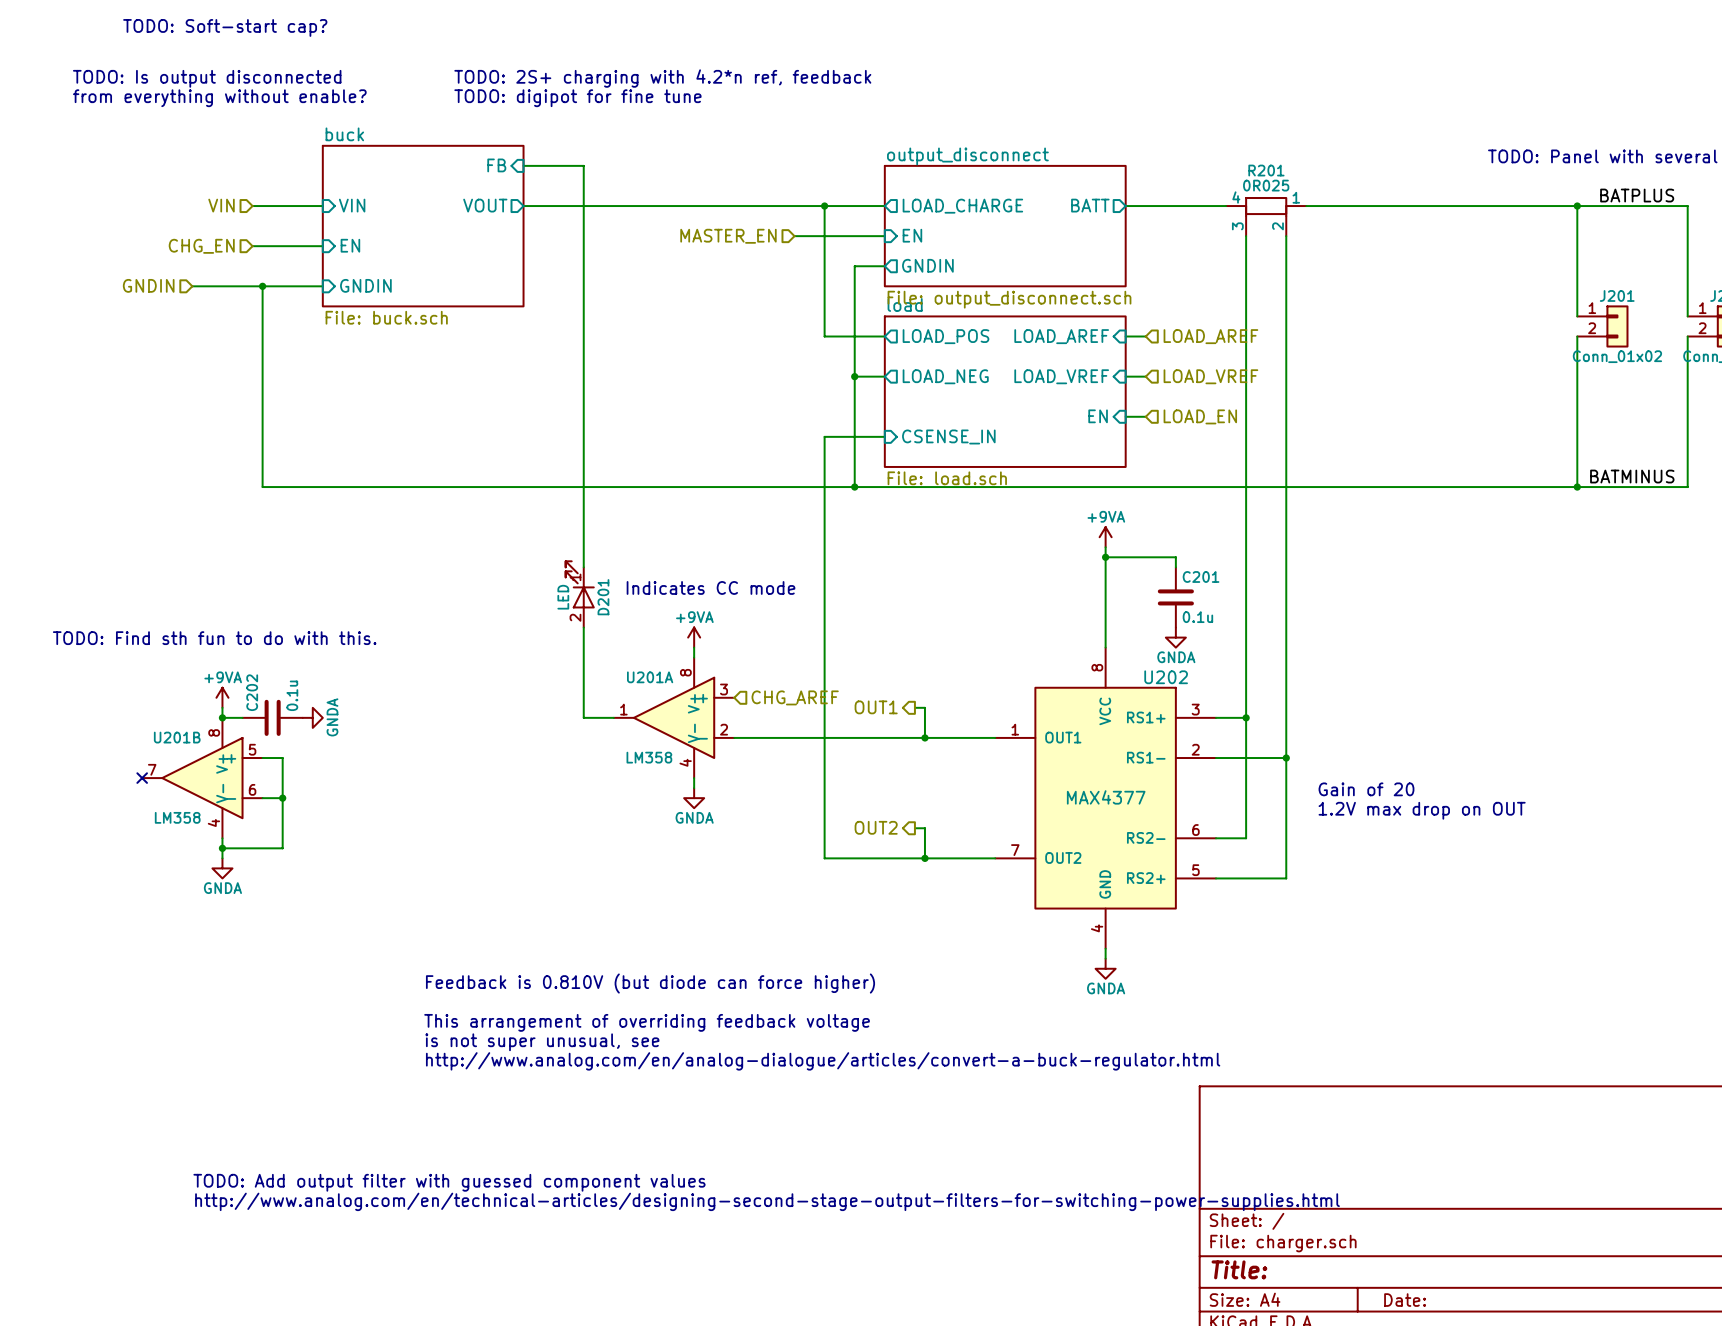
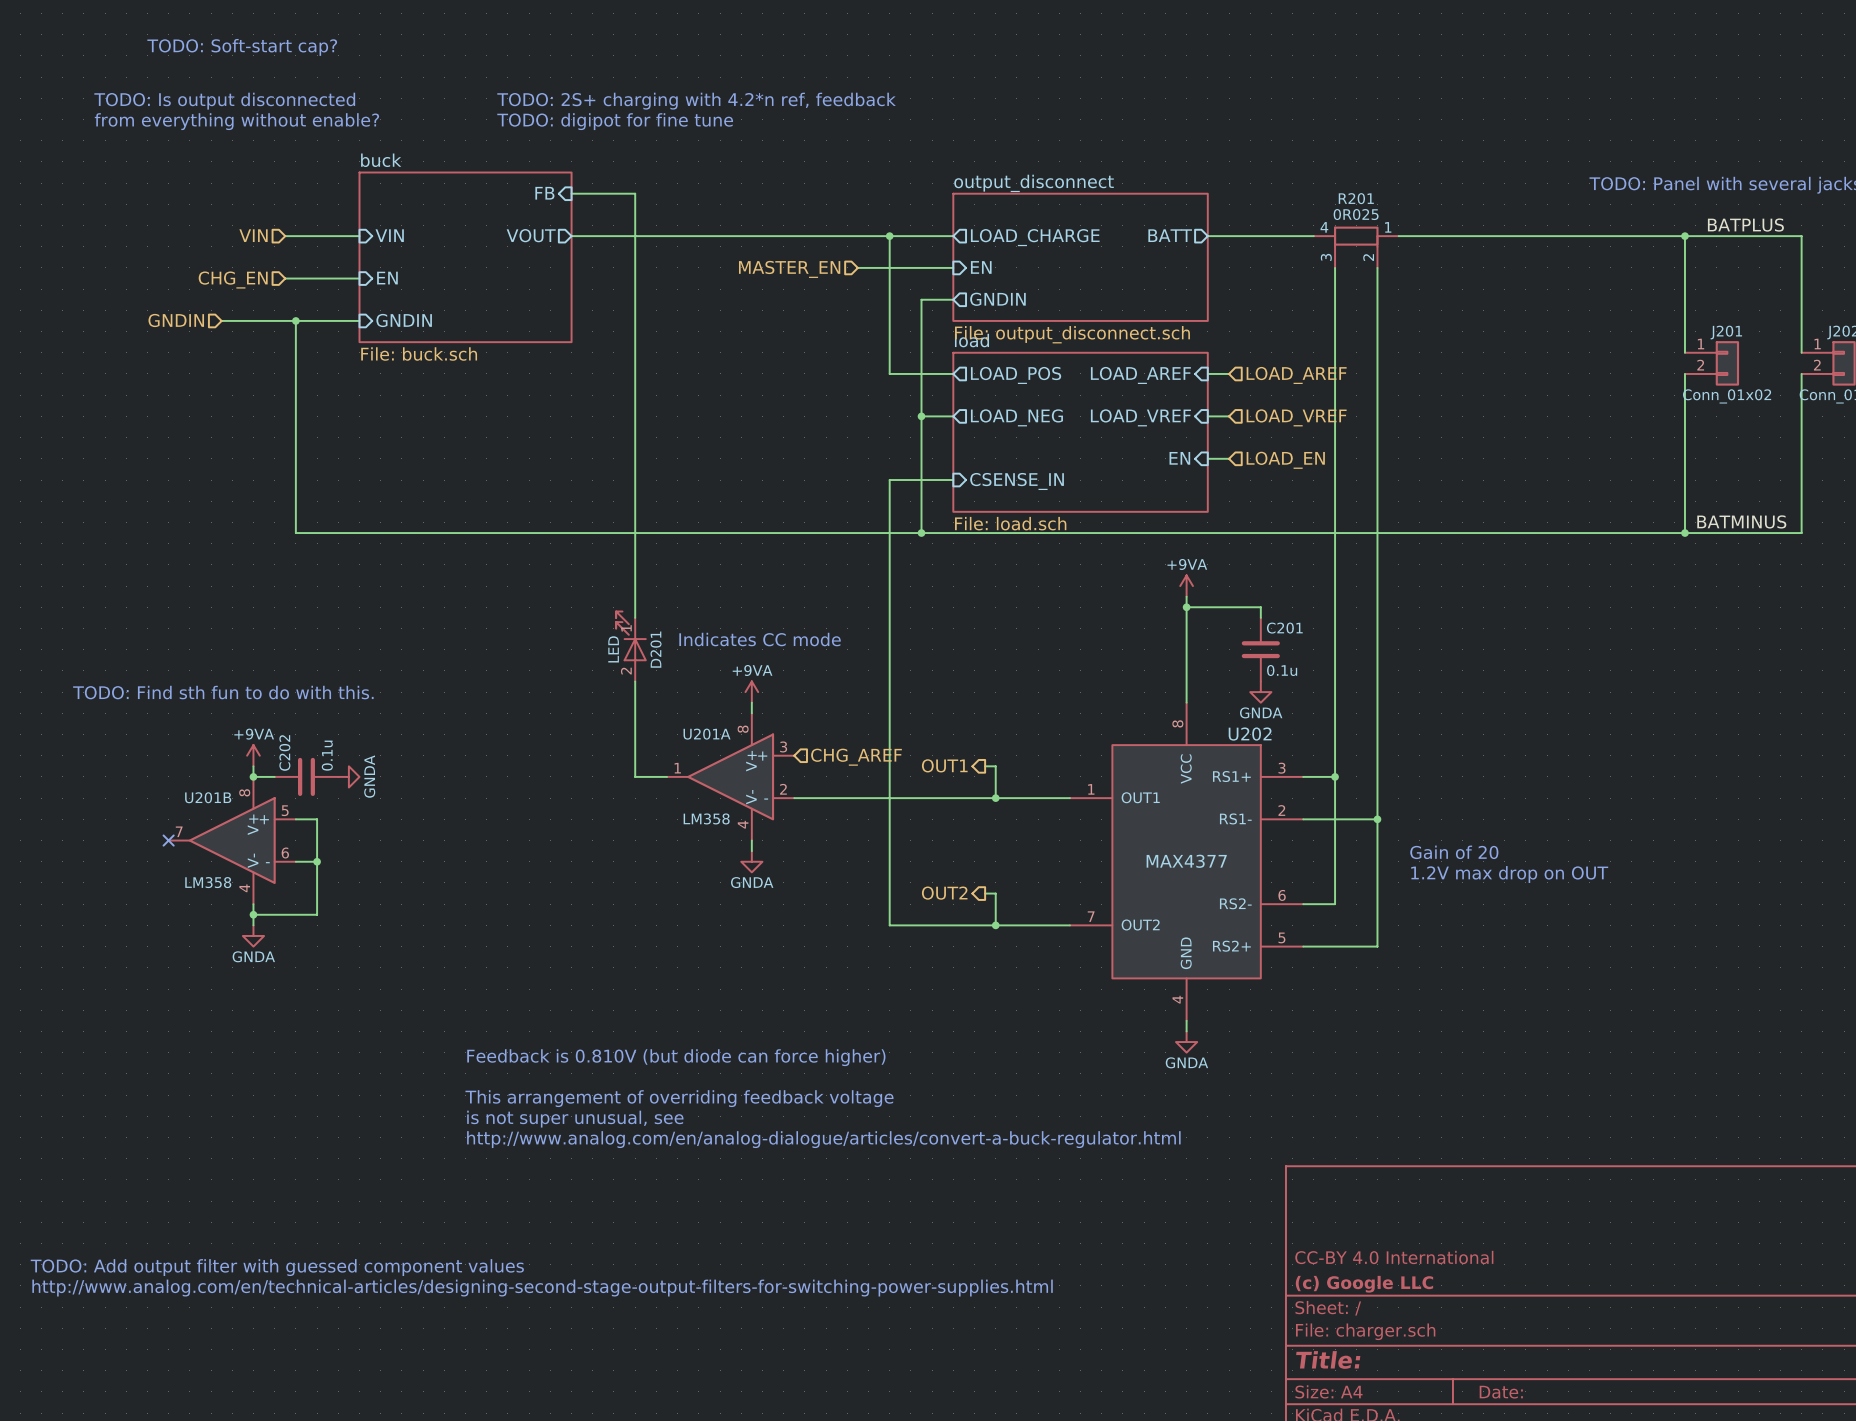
title block: none -> CC-BY 4.0 International (1394, 1257)
text position: TODO: Add output filter with guessed component values (449, 1182) -> TODO: Add output filter with guessed component values (277, 1267)
title block: none -> (c) Google LLC (1364, 1284)
text position: http://www.analog.com/en/technical-articles/designing-second-stage-output-filters-for-switching-power-supplies.html (767, 1201) -> http://www.analog.com/en/technical-articles/designing-second-stage-output-filters-for-switching-power-supplies.html (542, 1288)

